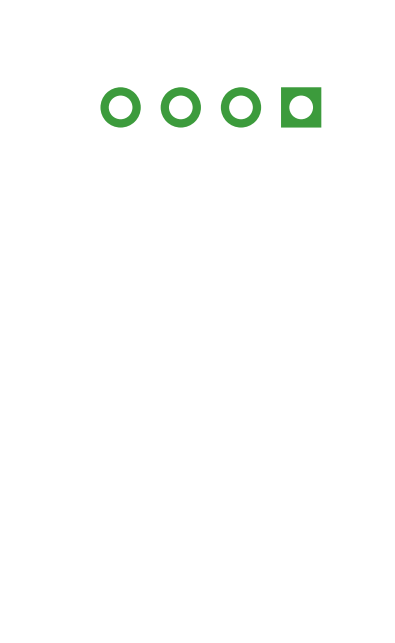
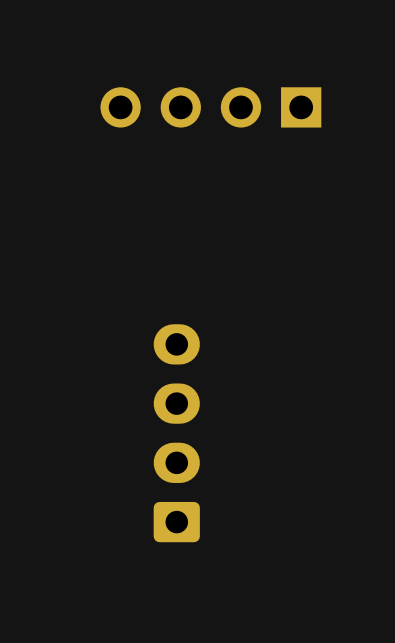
part: none -> (176, 433)

